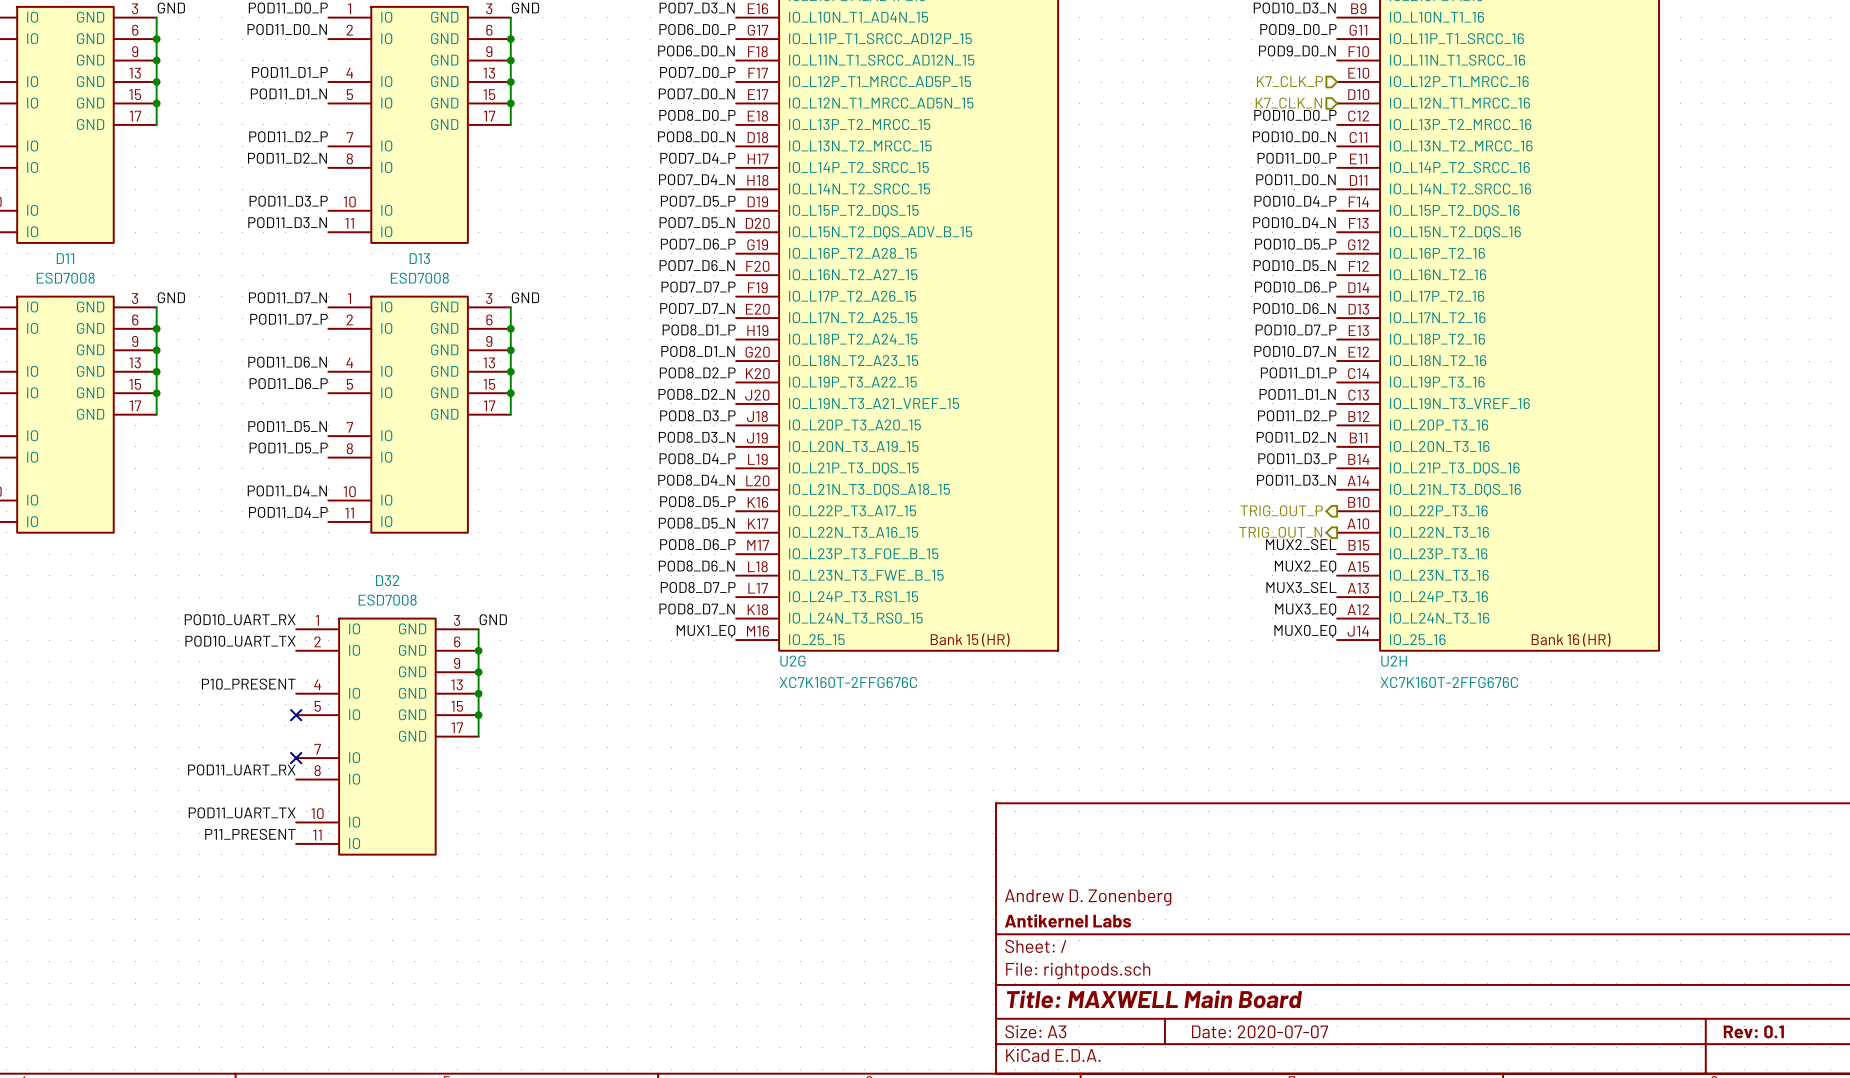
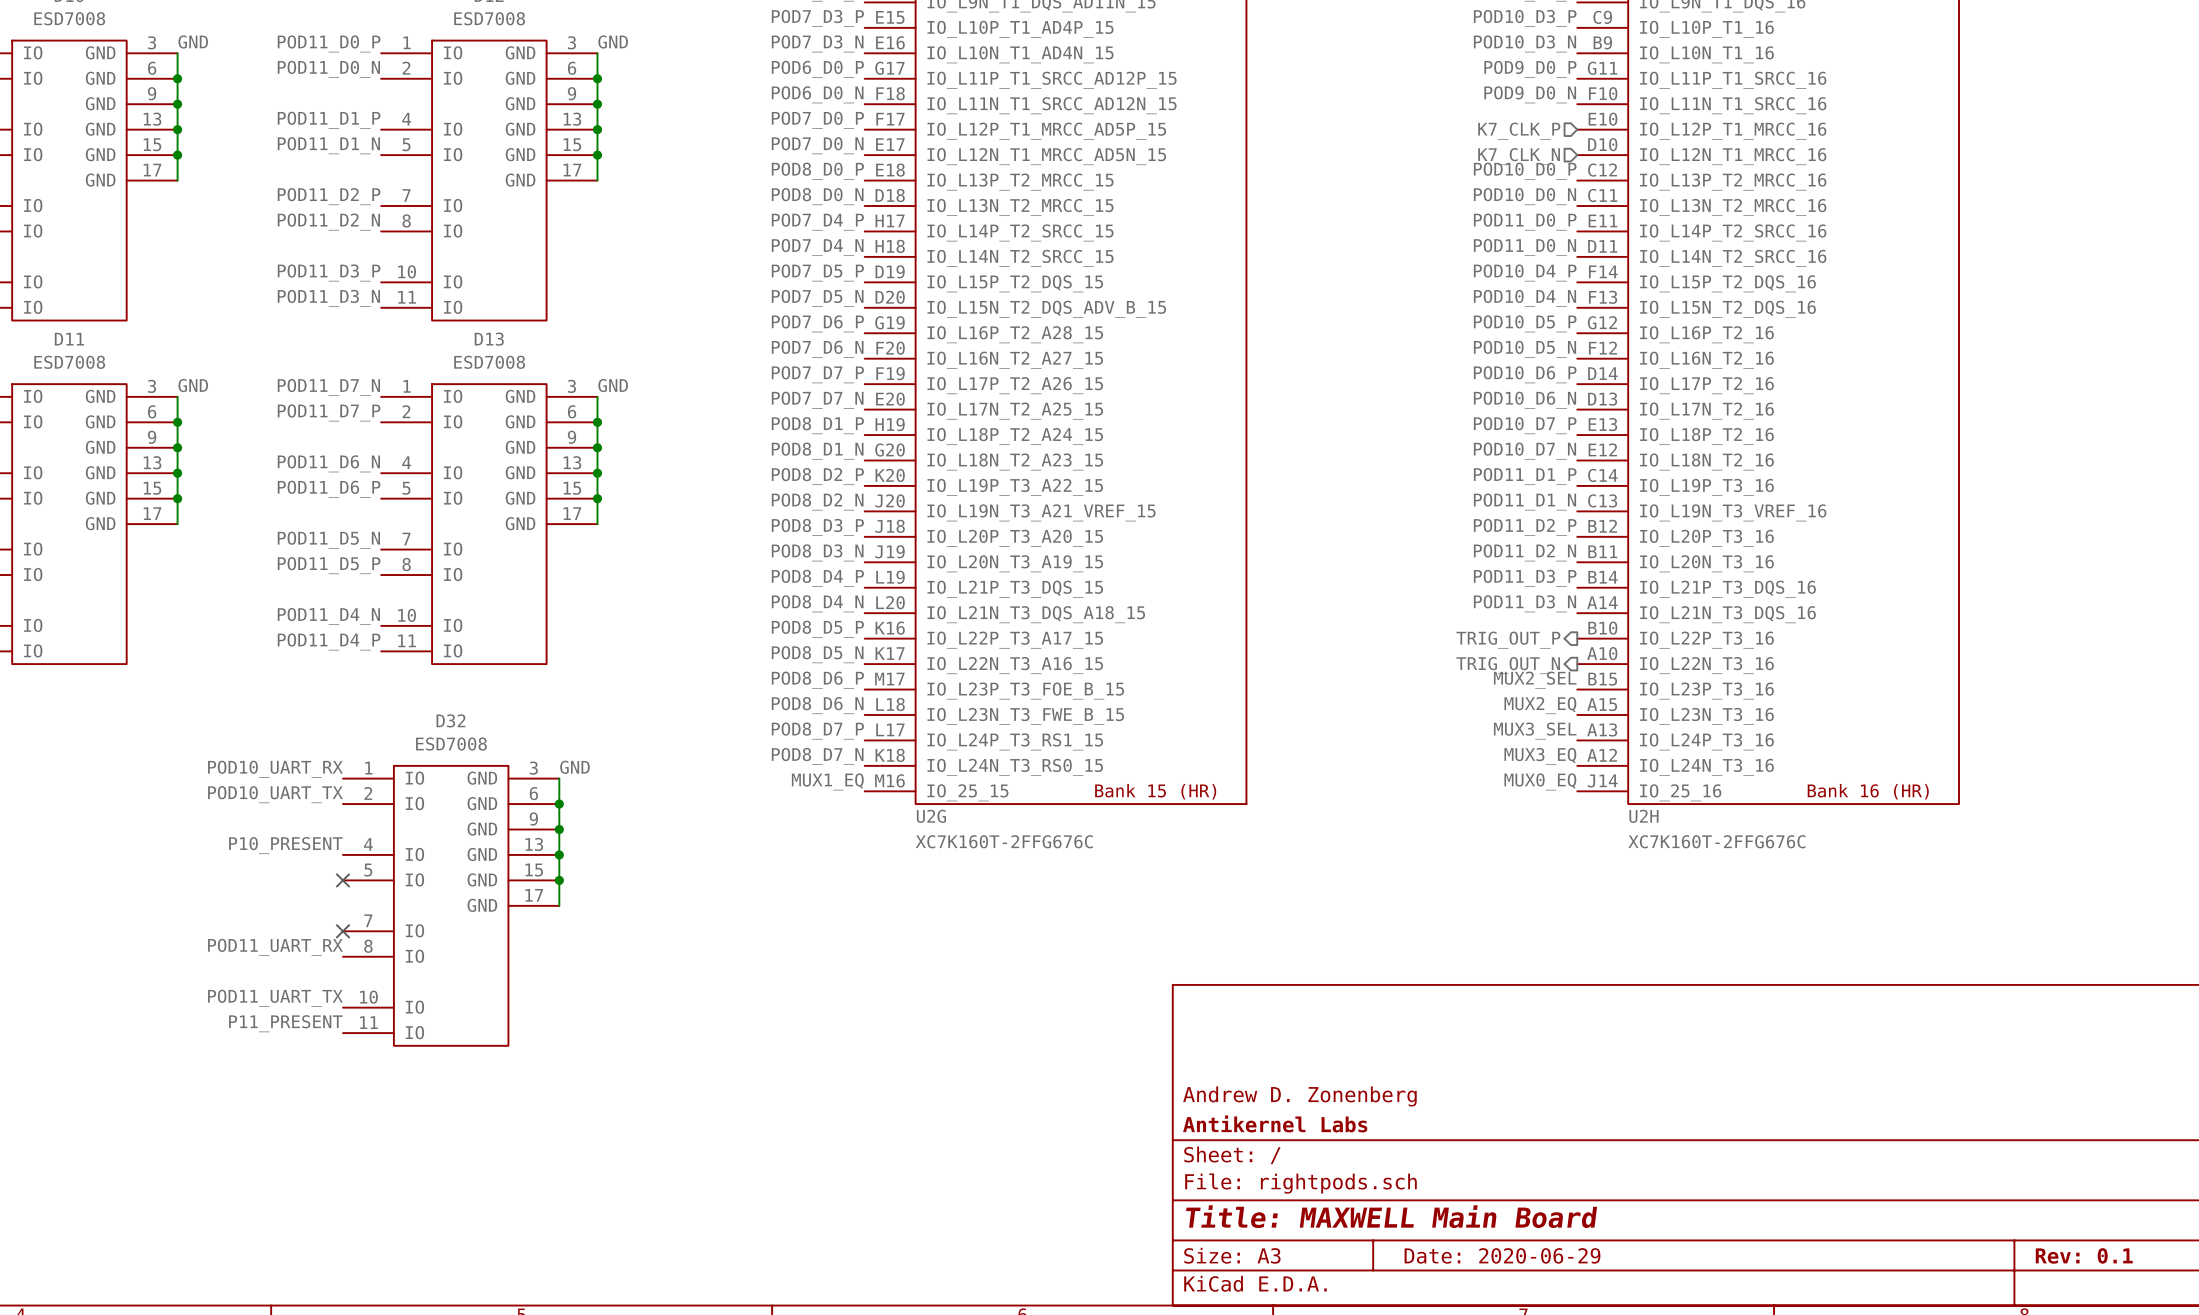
title block: Date: 2020-07-07 (1260, 1031) -> Date: 2020-06-29 (1502, 1255)

